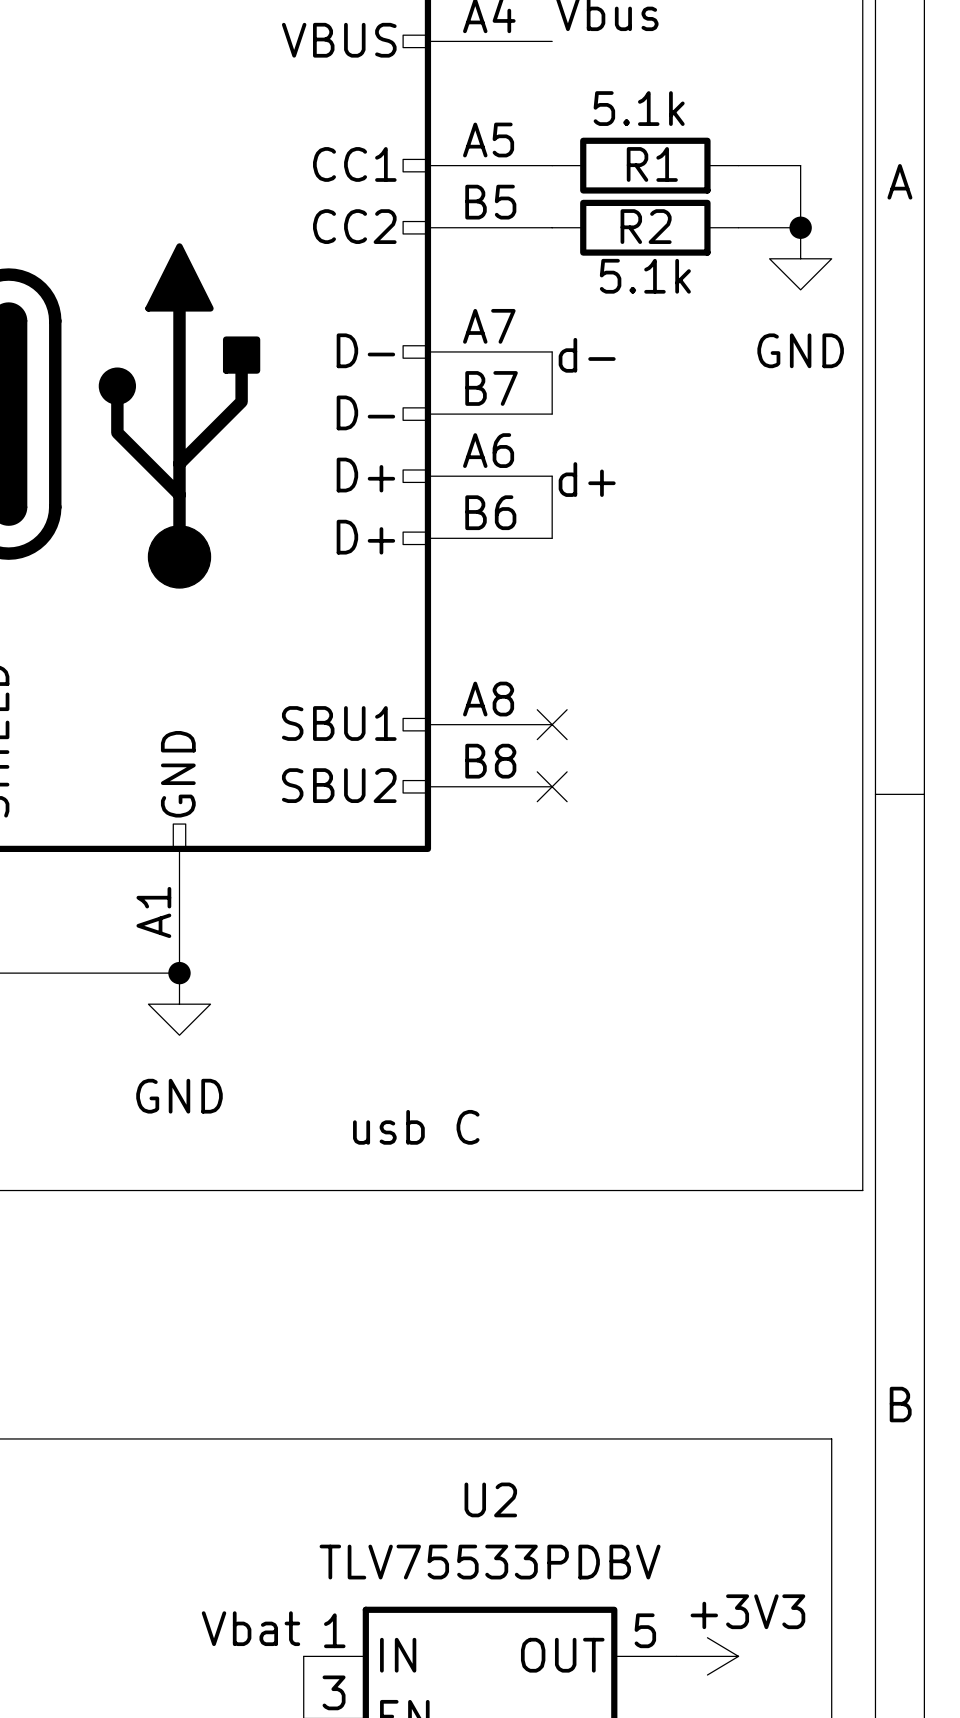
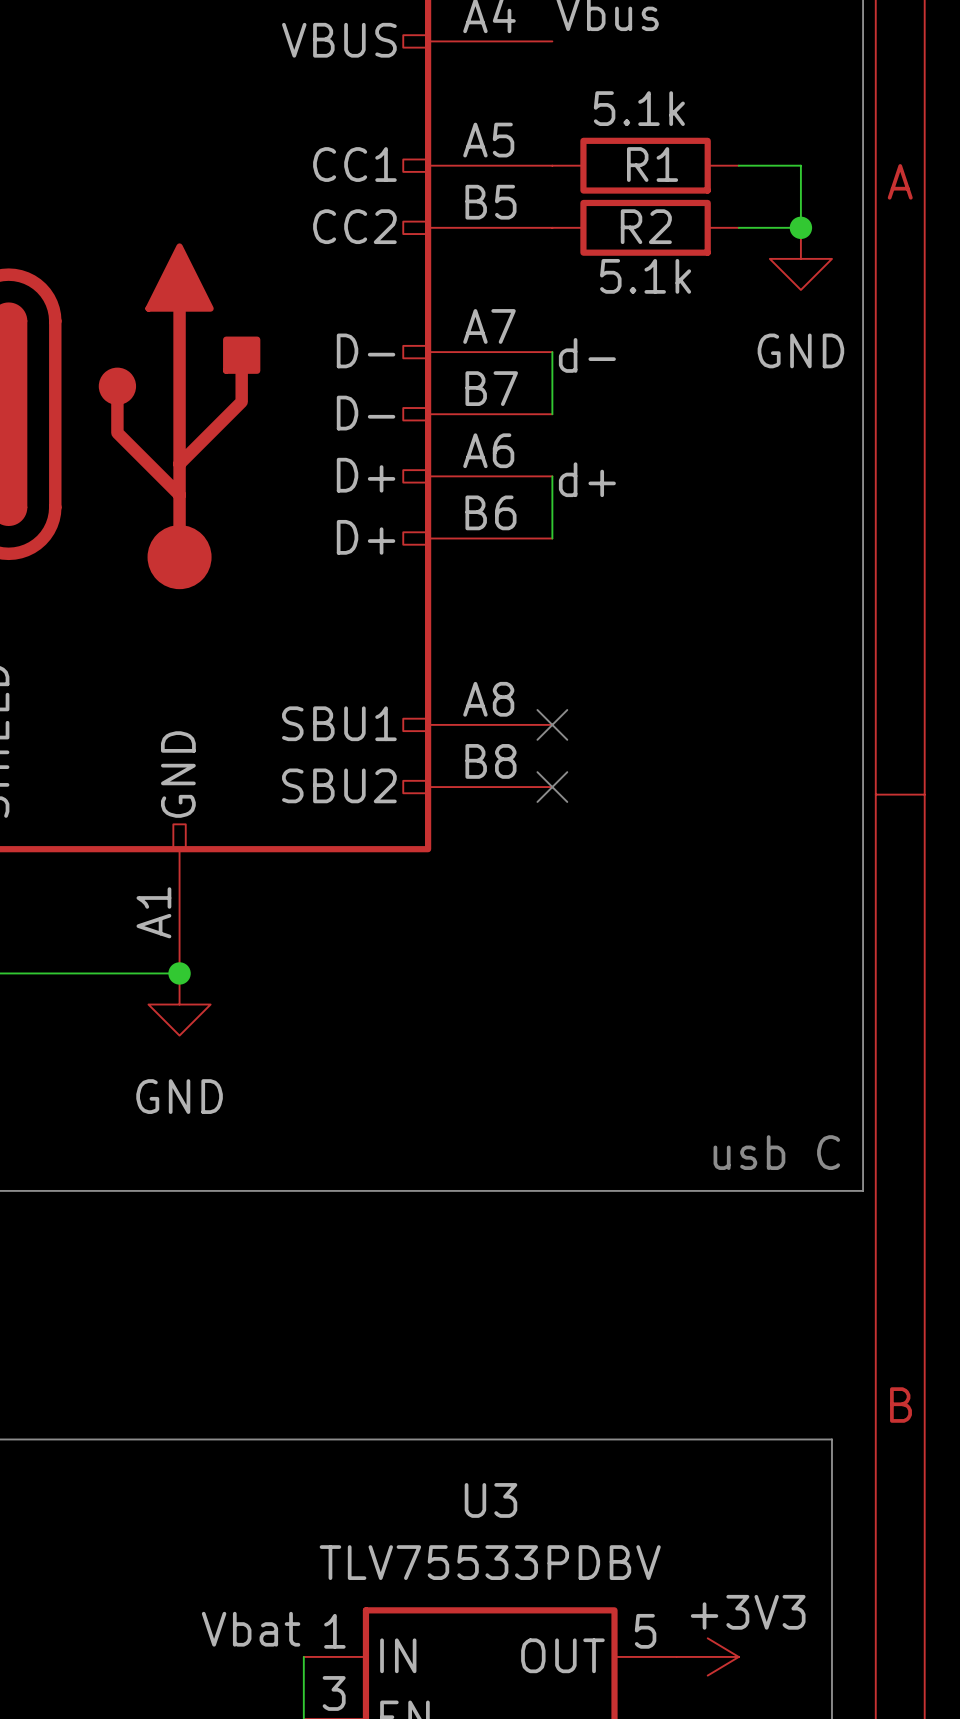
text position: usb C (416, 1127) -> usb C (776, 1152)
U2 name: U2 (490, 1499) -> U3 (490, 1500)

